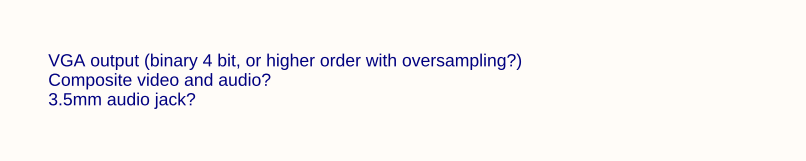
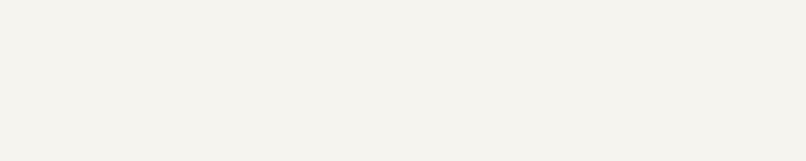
text: VGA output (binary 4 bit, or higher order with oversampling?) (284, 61) -> none
text: Composite video and audio? (159, 81) -> none
text: 3.5mm audio jack? (122, 100) -> none

